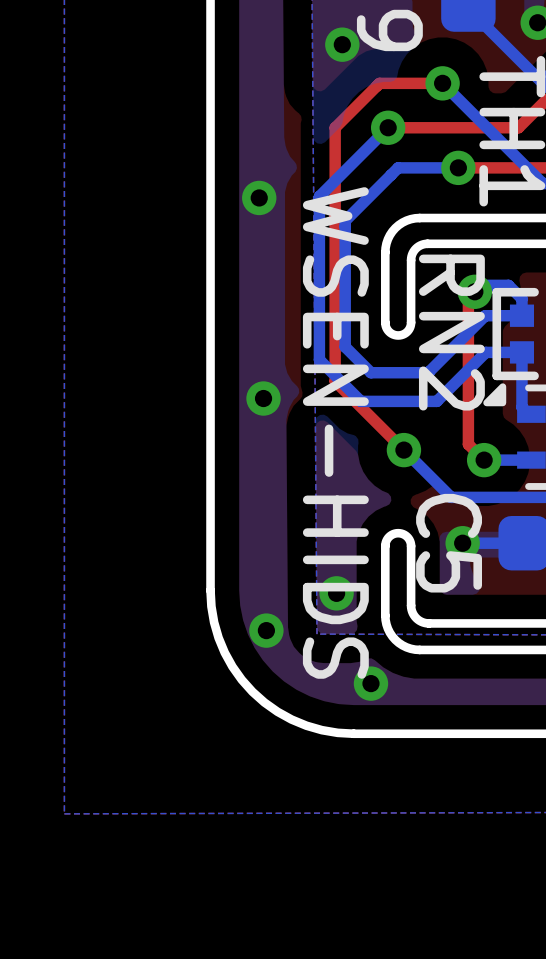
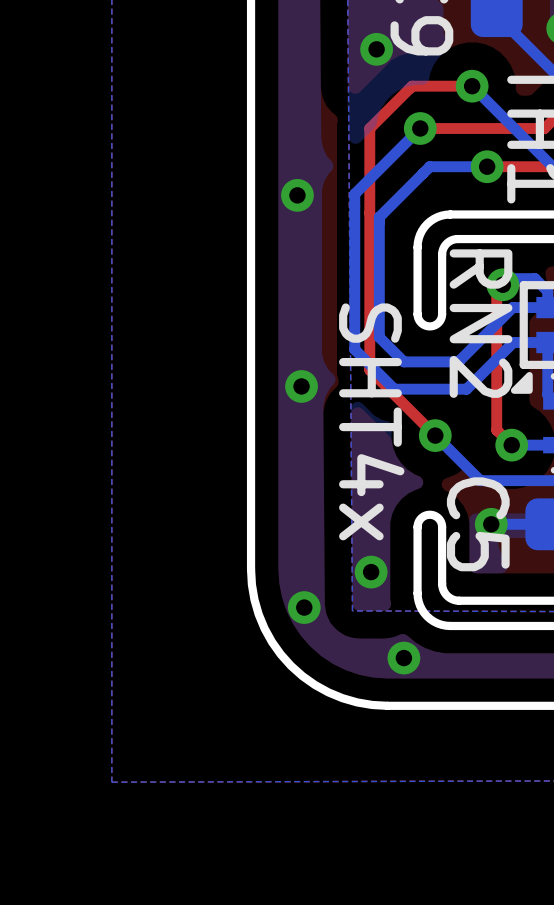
part value: WSEN-HIDS (335, 432) -> SHT4x (371, 421)

